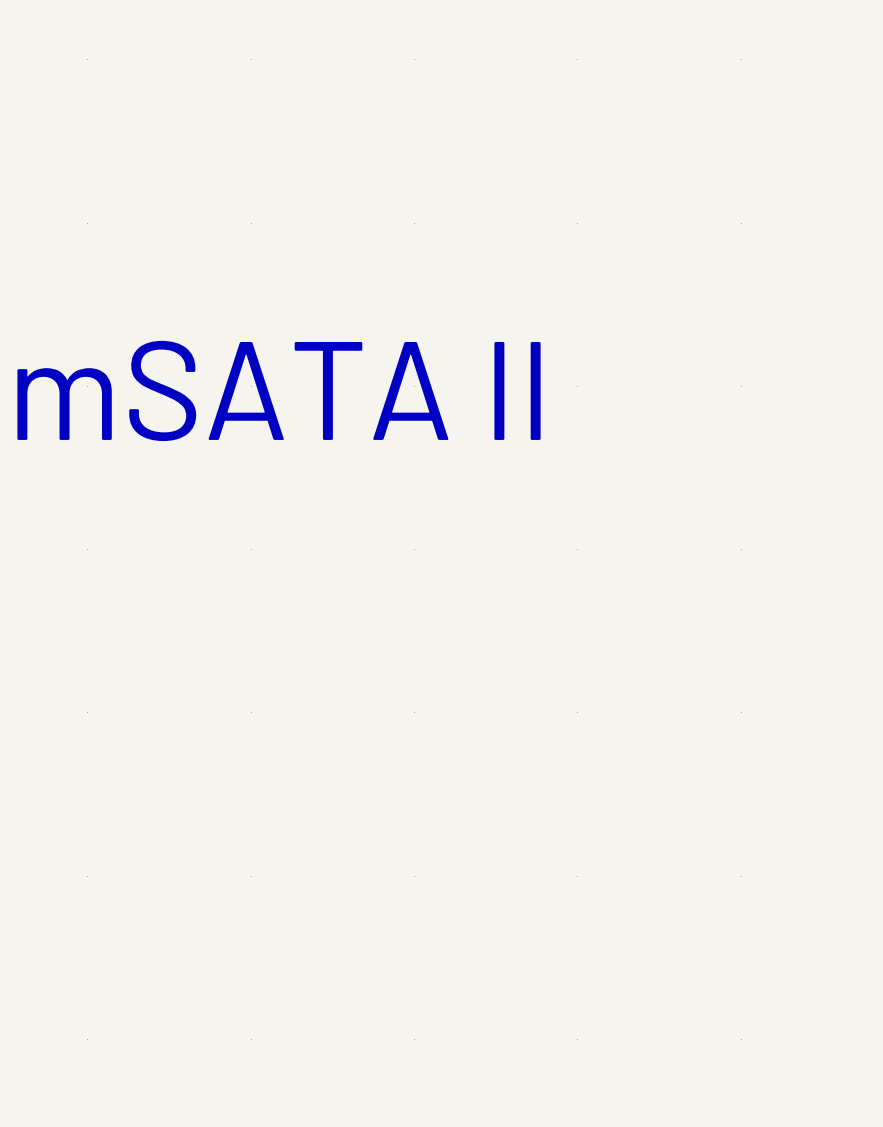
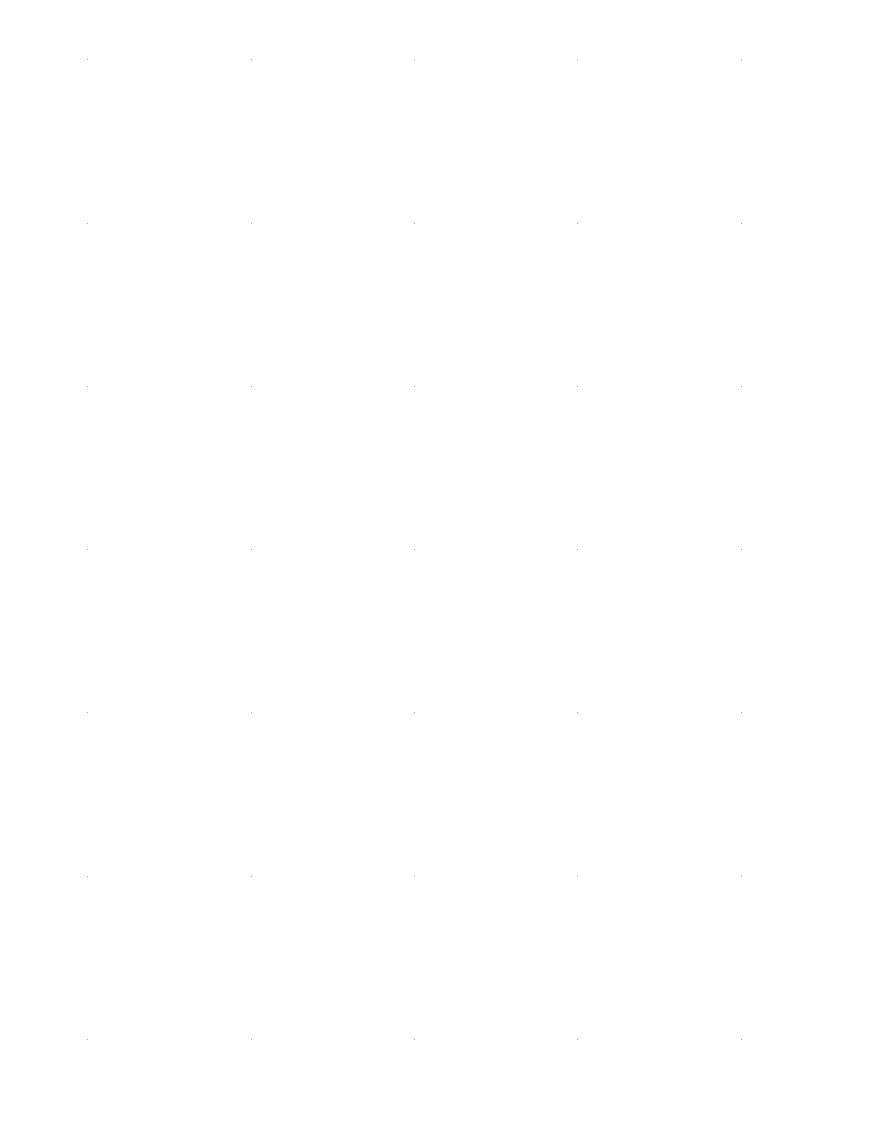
text: mSATA II (279, 390) -> none

